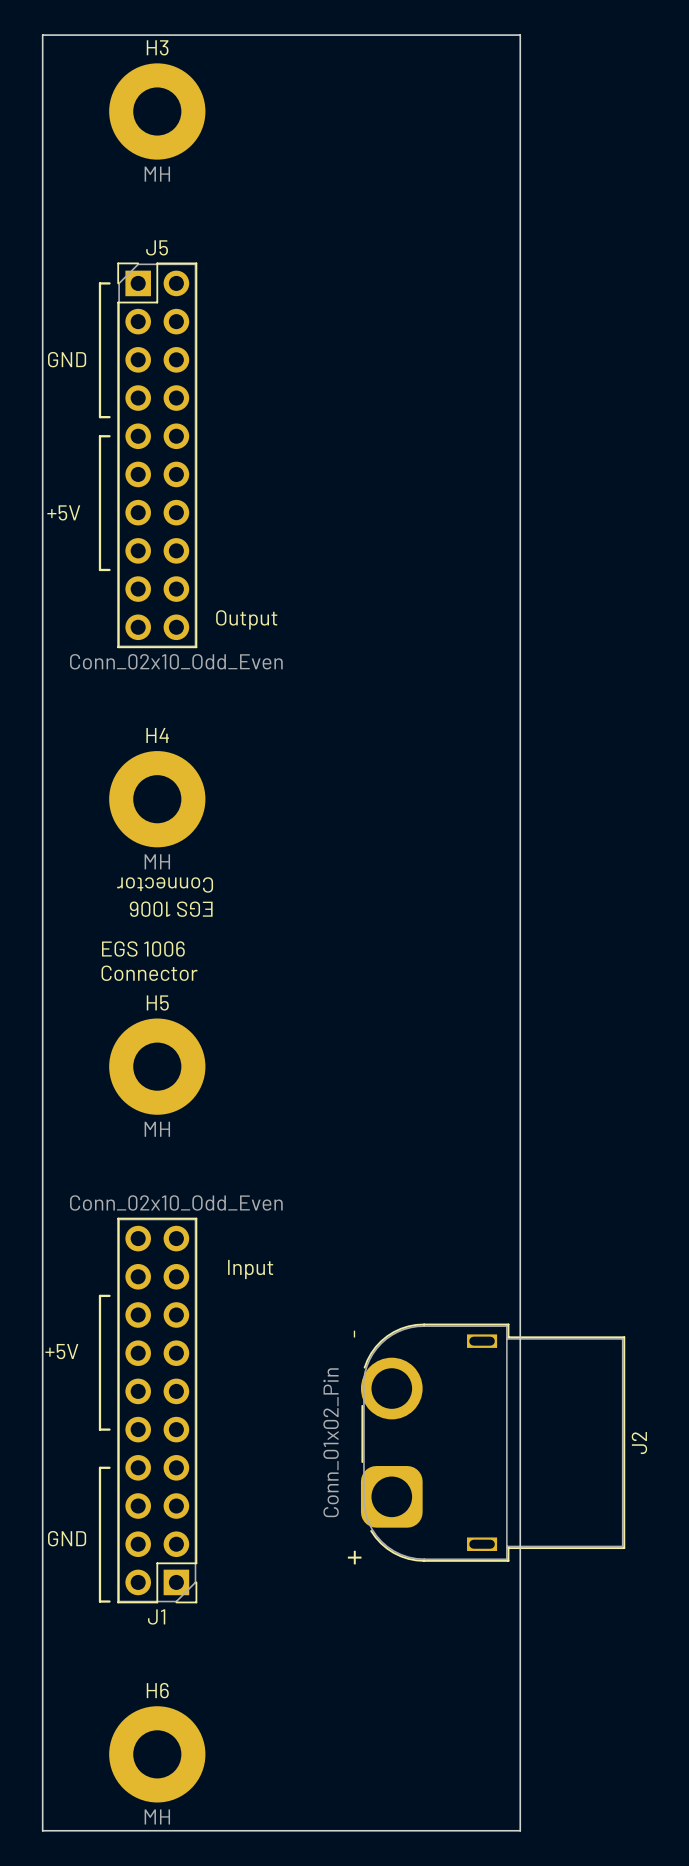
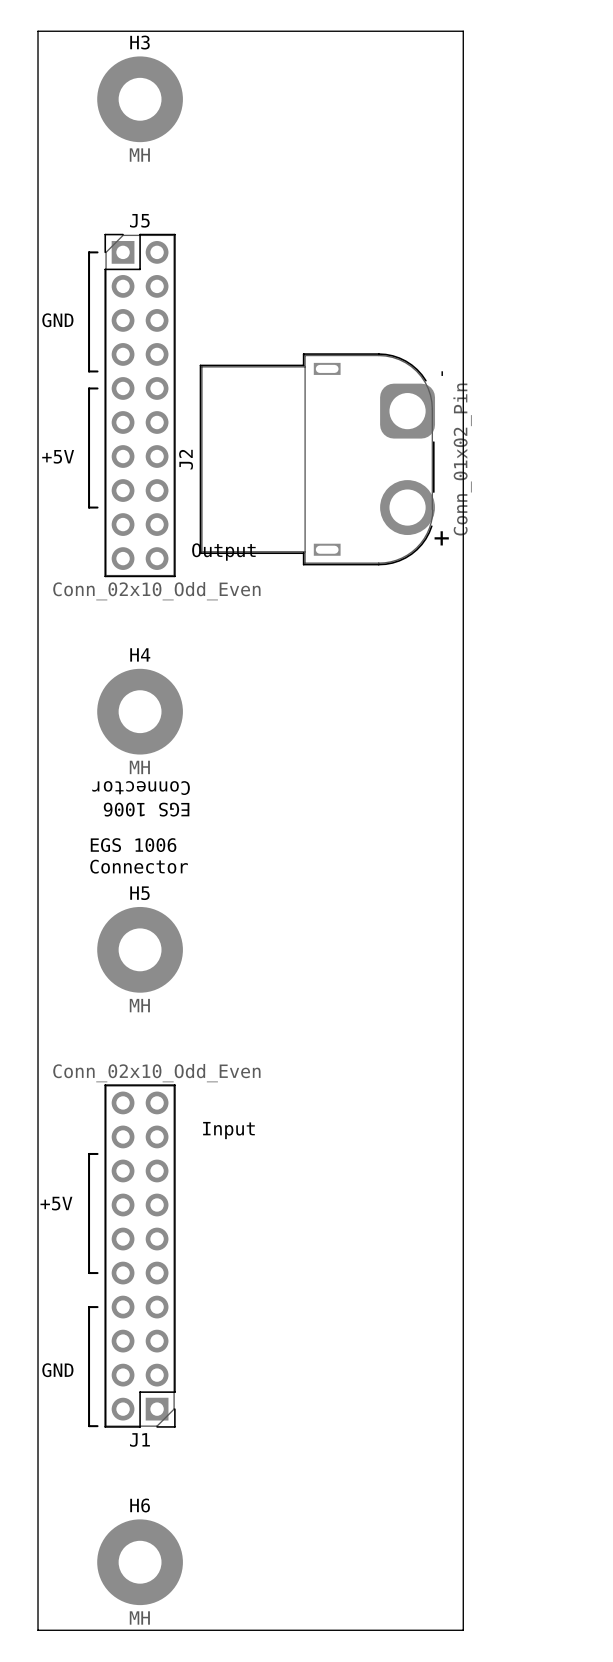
J2 footprint: [360, 1323, 626, 1562] -> [199, 353, 436, 566]
J2 value position: Conn_01x02_Pin (331, 1442) -> Conn_01x02_Pin (462, 459)
J2 name position: J2 (639, 1443) -> J2 (186, 459)

